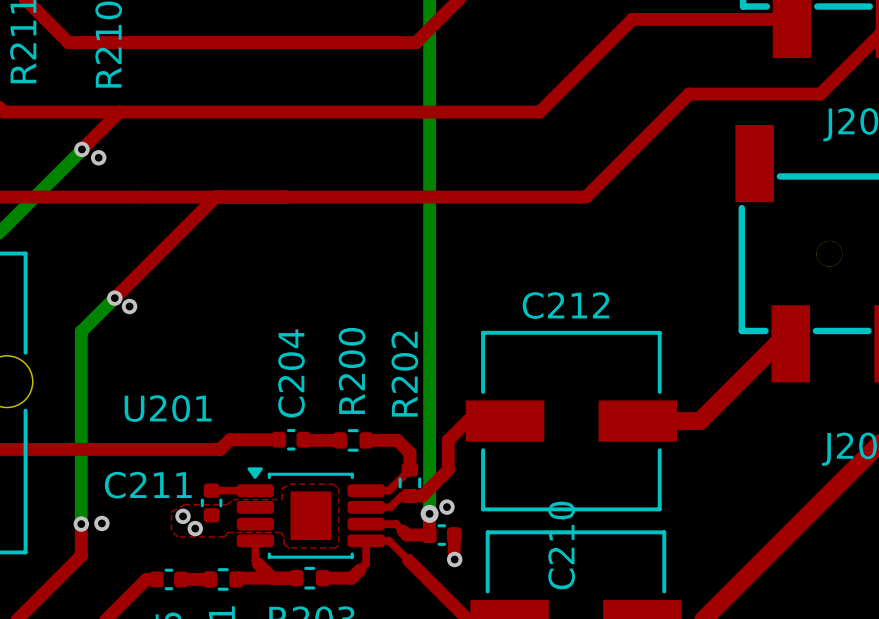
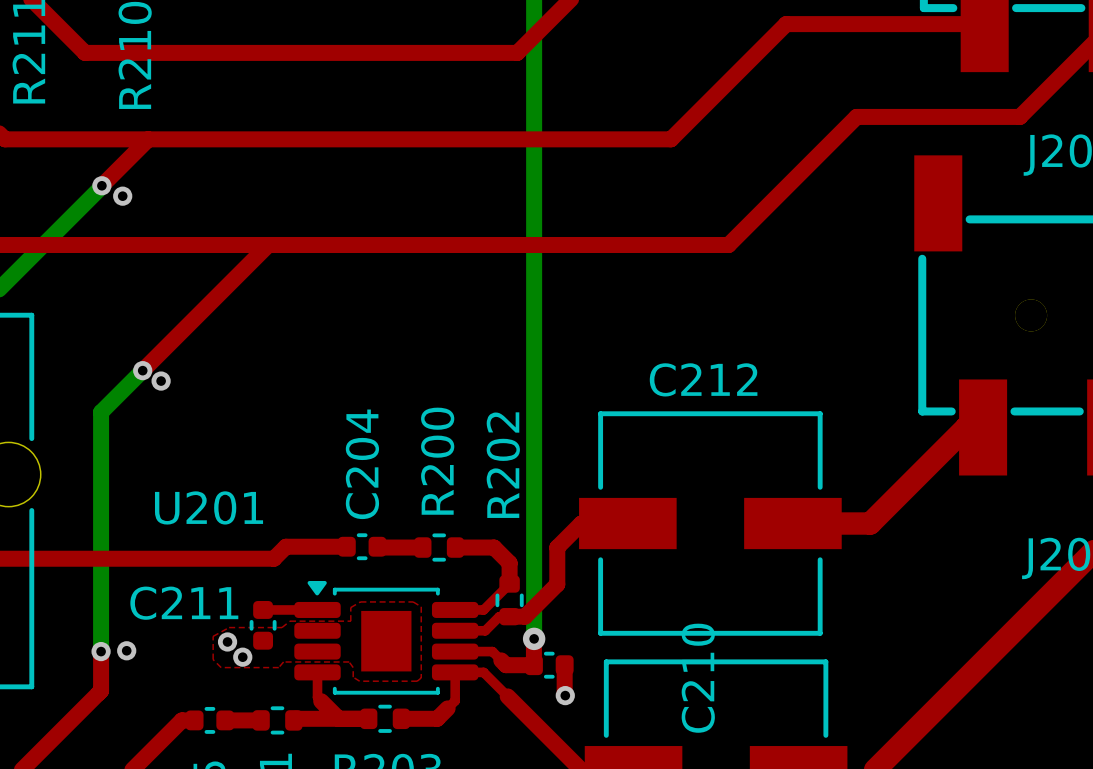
via: (446, 507) -> none

